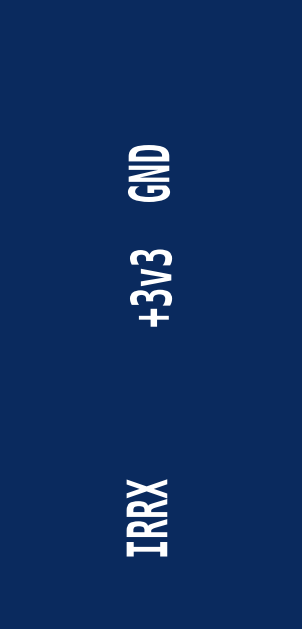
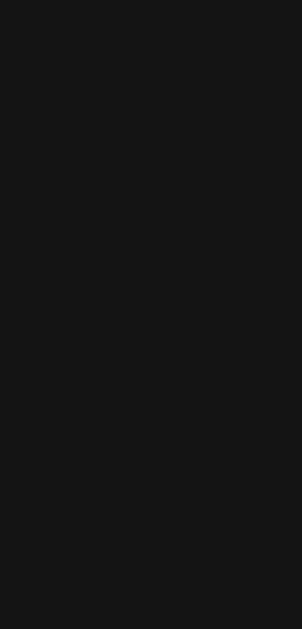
text: GND (149, 173) -> none
text: +3v3 (151, 288) -> none
text: IRRX (146, 517) -> none

